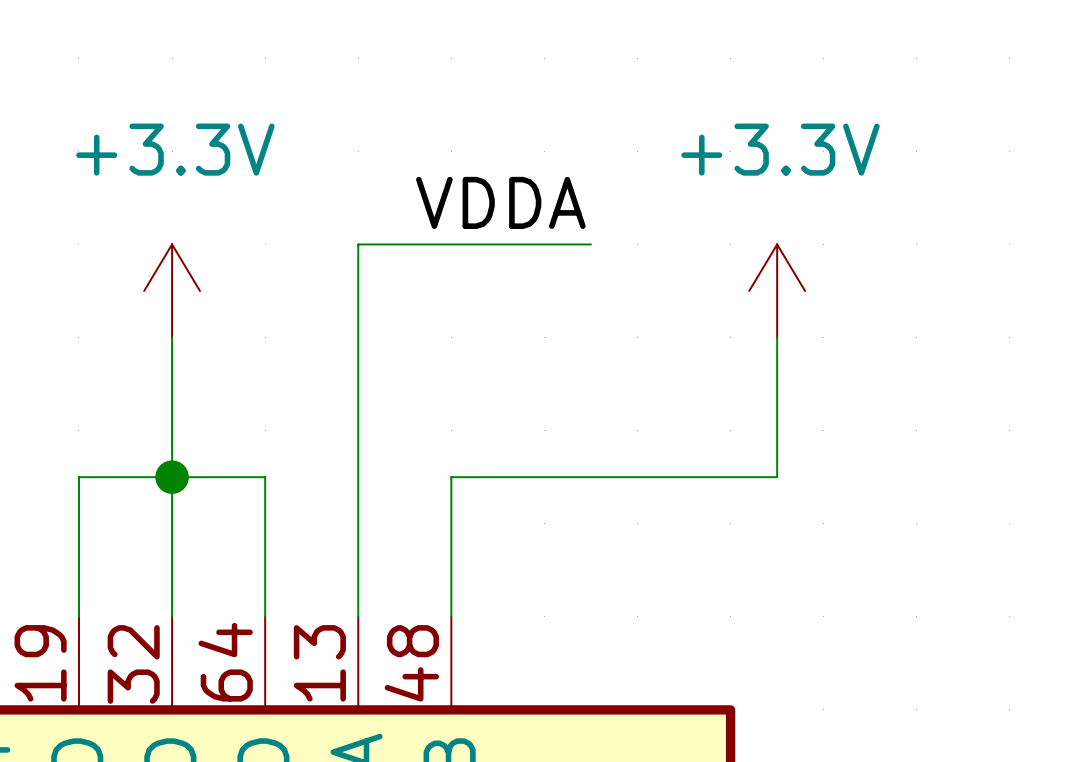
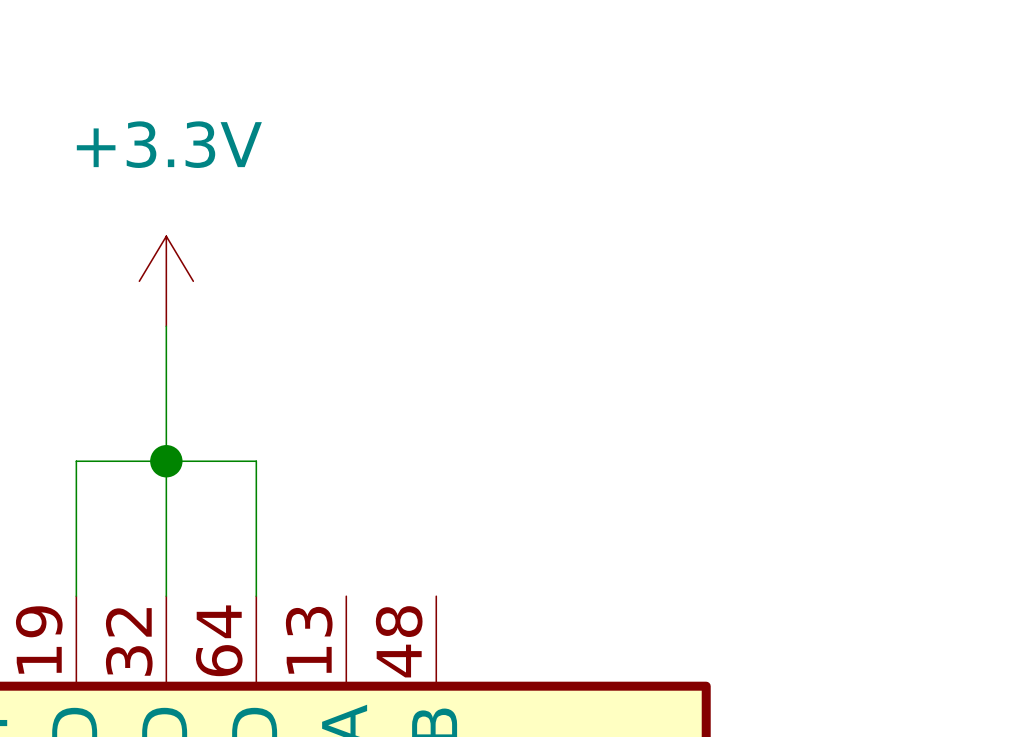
label: VDDA (500, 202) -> none
wire: (590, 244) (358, 244) (358, 616) -> none
power symbol: +3.3V (777, 290) -> none
wire: (777, 337) (777, 477) (451, 477) (451, 616) -> none

